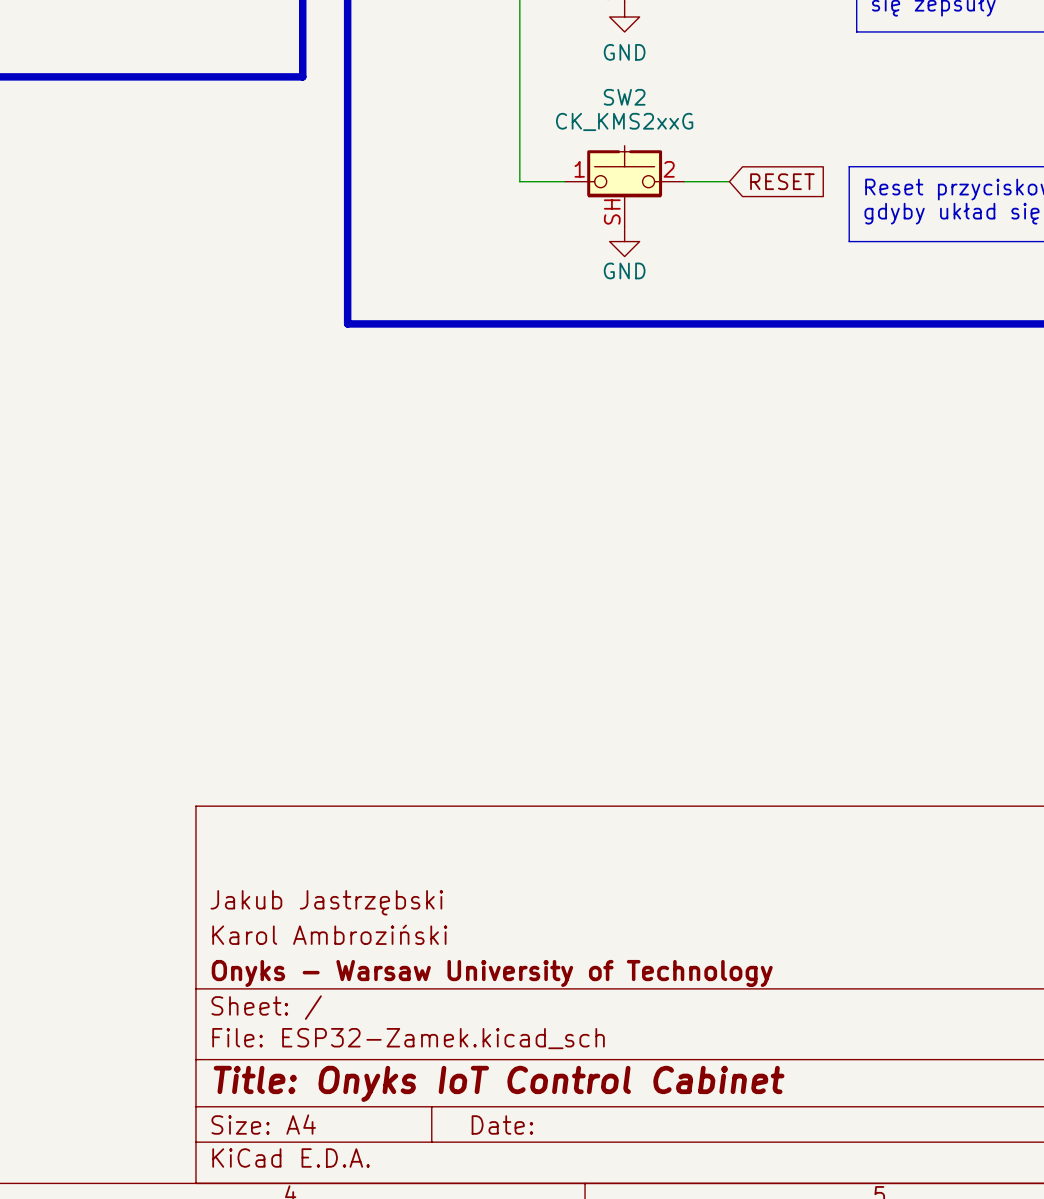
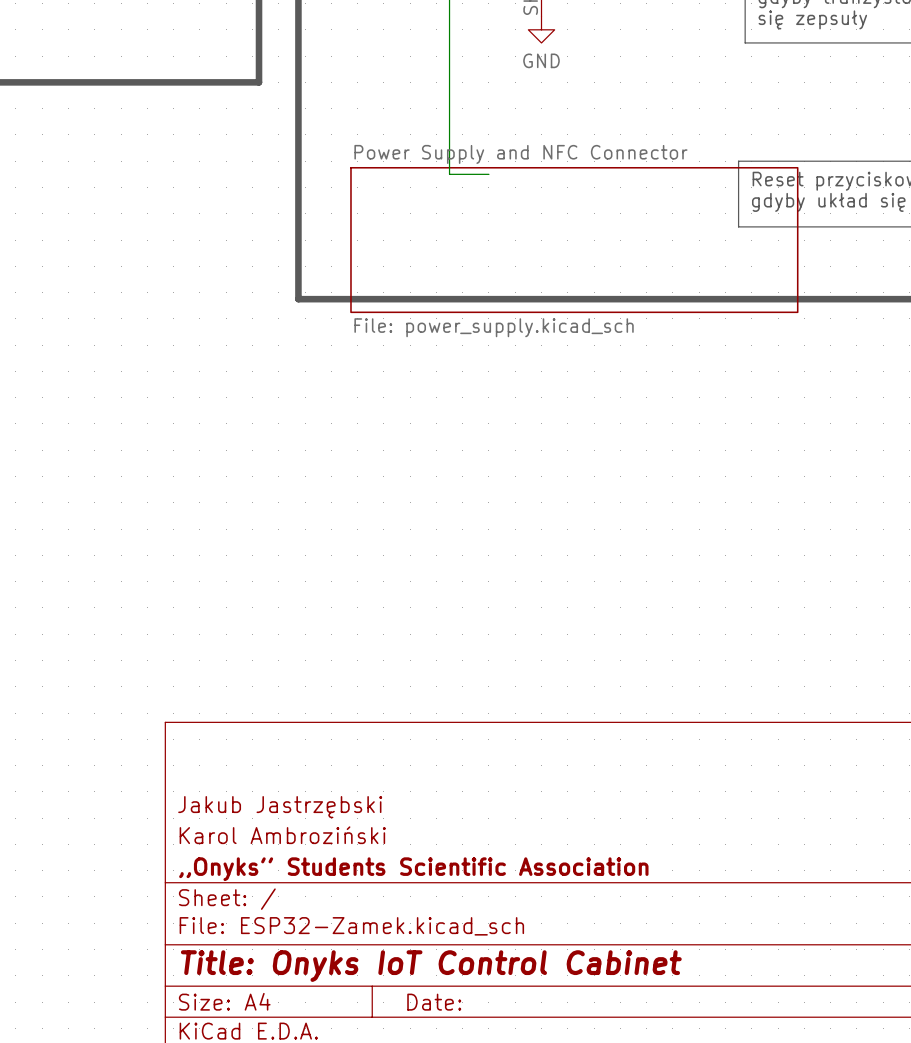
wire: (684, 181) (729, 181) -> none
global label: RESET (782, 181) -> none
SW2: CK_KMS2xxG (624, 186) -> none
power symbol: GND (624, 241) -> none
sheet Power Supply and NFC Connector: none -> File: power_supply.kicad_sch (574, 240)
title block: Onyks - Warsaw University of Technology (492, 973) -> ,,Onyks'' Students Scientific Association (413, 869)

